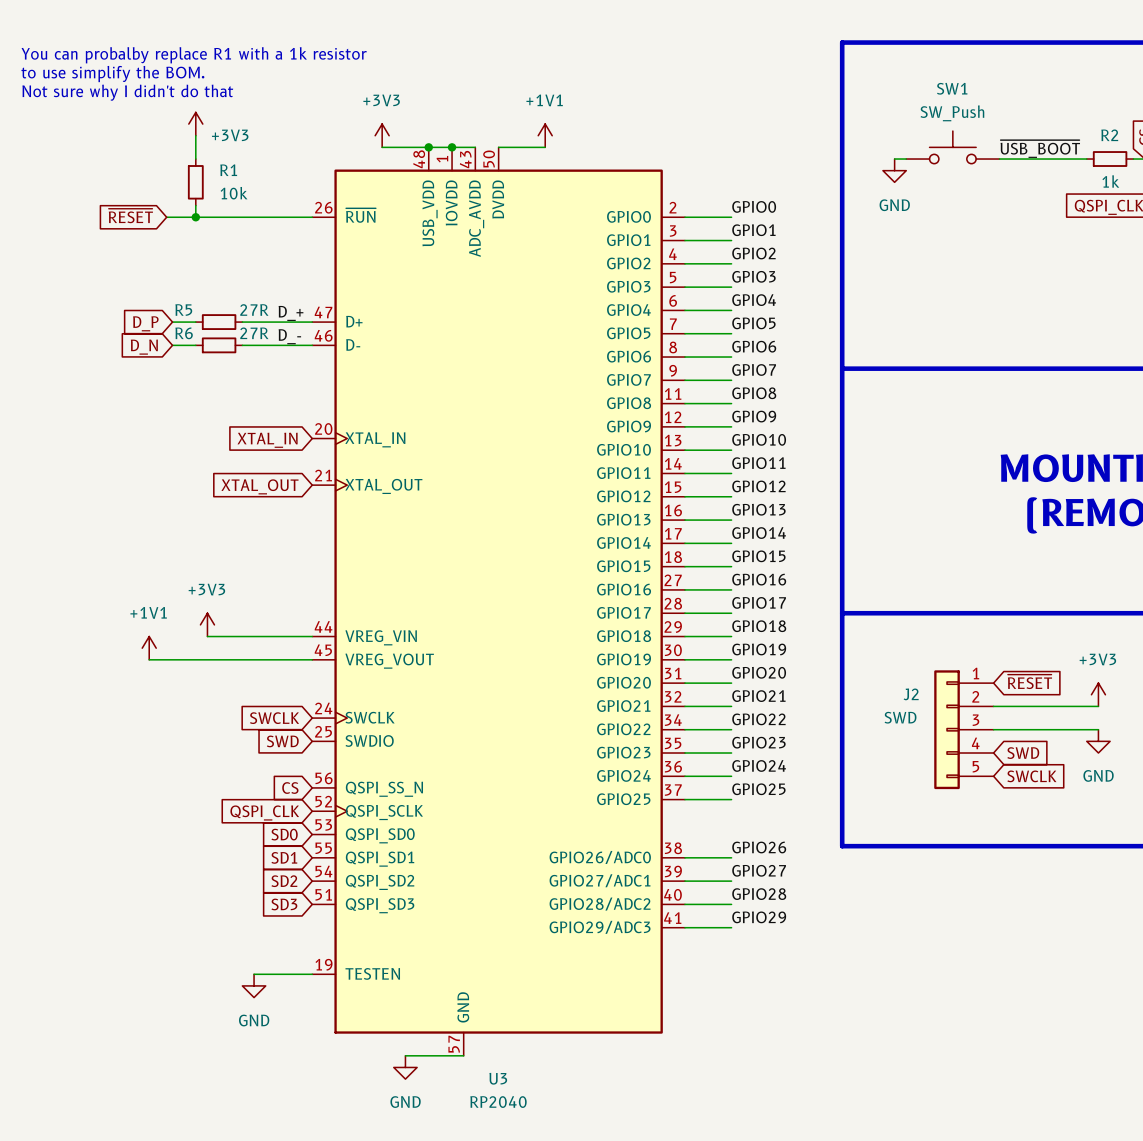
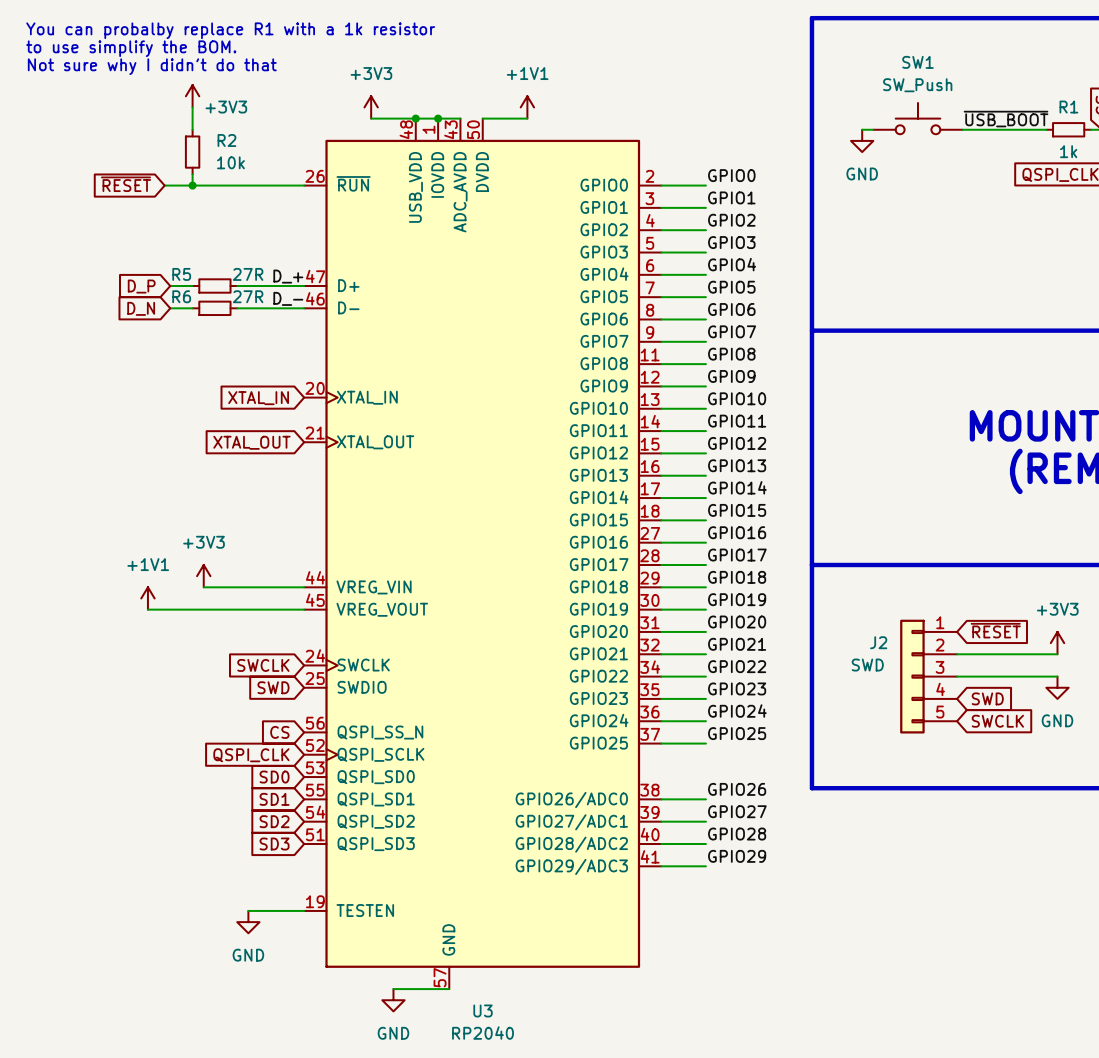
R2 name: R2 (1109, 135) -> R1 (1068, 107)
R1 name: R1 (228, 170) -> R2 (226, 140)

